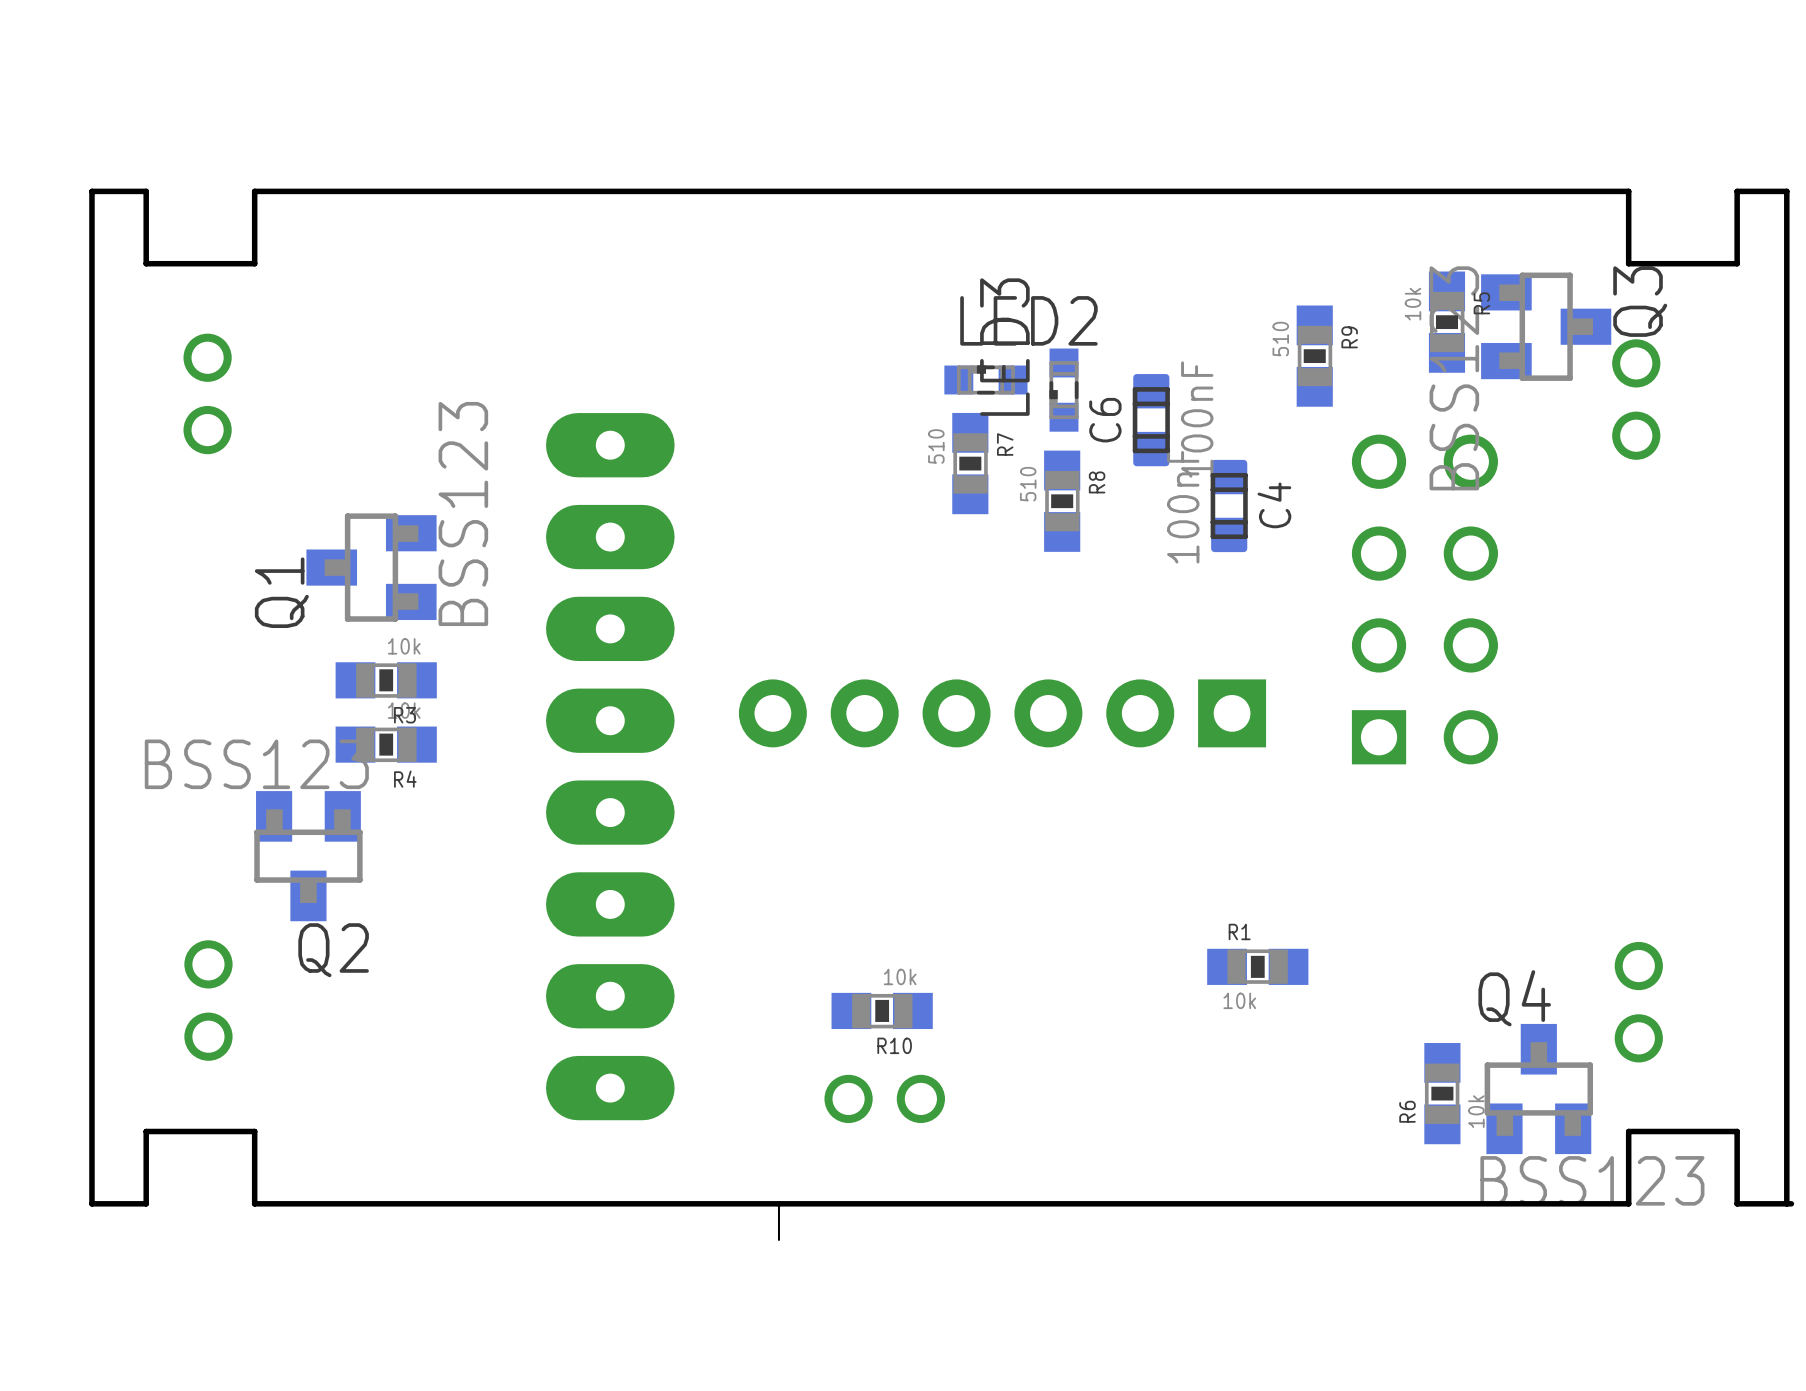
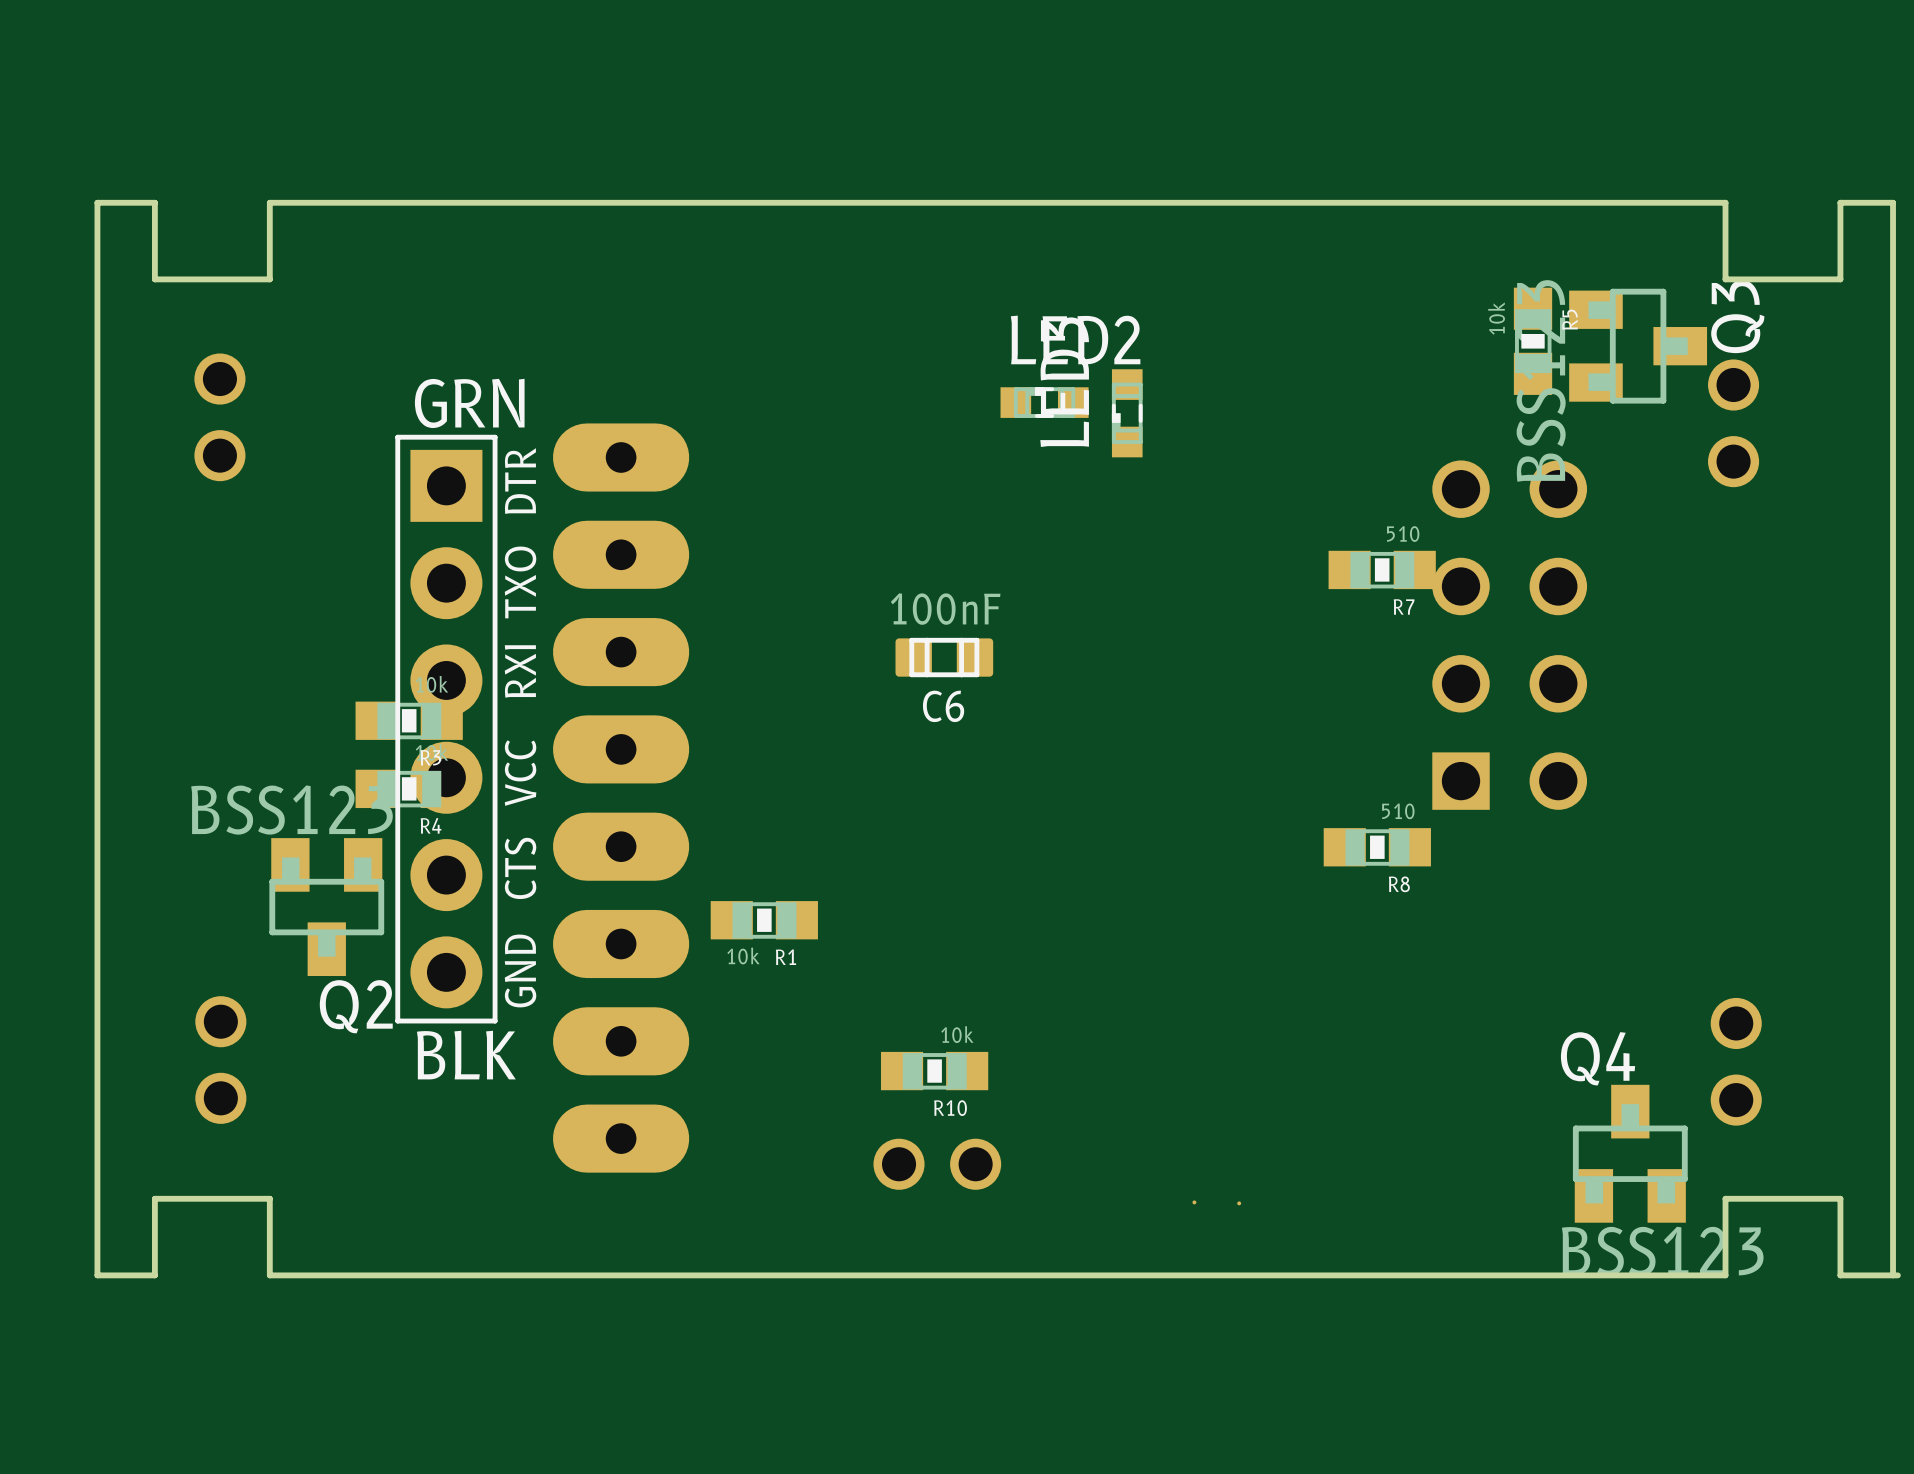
R9: 510 (1314, 356) -> none
C6 rotation: 0° (1151, 420) -> 90° clockwise (944, 657)
C6 position: (1151, 420) -> (944, 657)
R7 rotation: 0° (970, 463) -> 90° clockwise (1382, 569)
R7 position: (970, 463) -> (1382, 569)
R8 rotation: 0° (1062, 501) -> 90° clockwise (1377, 847)
R8 position: (1062, 501) -> (1377, 847)
C4: 100nF (1229, 505) -> none
Q1: BSS123 (371, 567) -> none
part side: top (1002, 713) -> bottom (446, 729)
part position: (610, 766) -> (621, 798)
R1 name position: R1 (1239, 931) -> R1 (785, 957)
R1 position: (1257, 966) -> (764, 920)
R6: 10k (1442, 1093) -> none
part: none -> (1194, 1202)
part: none -> (1239, 1203)
board edge: (778, 1203) (778, 1239) -> none

